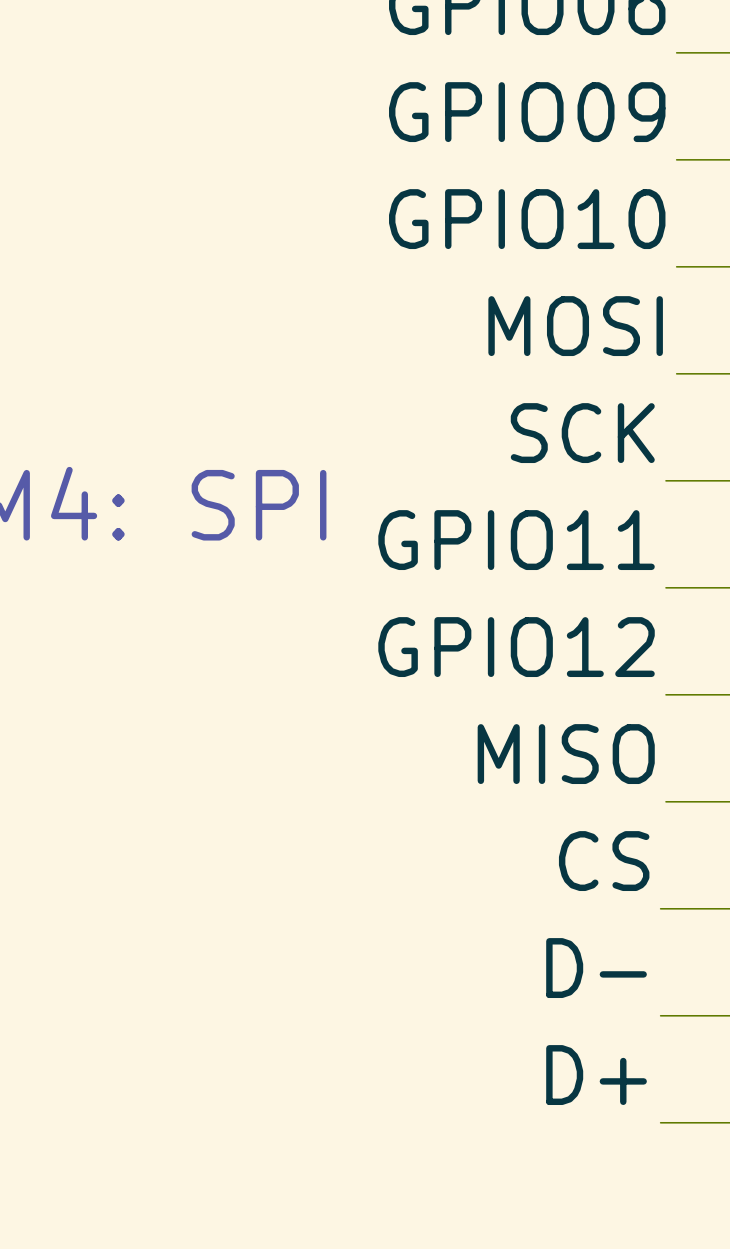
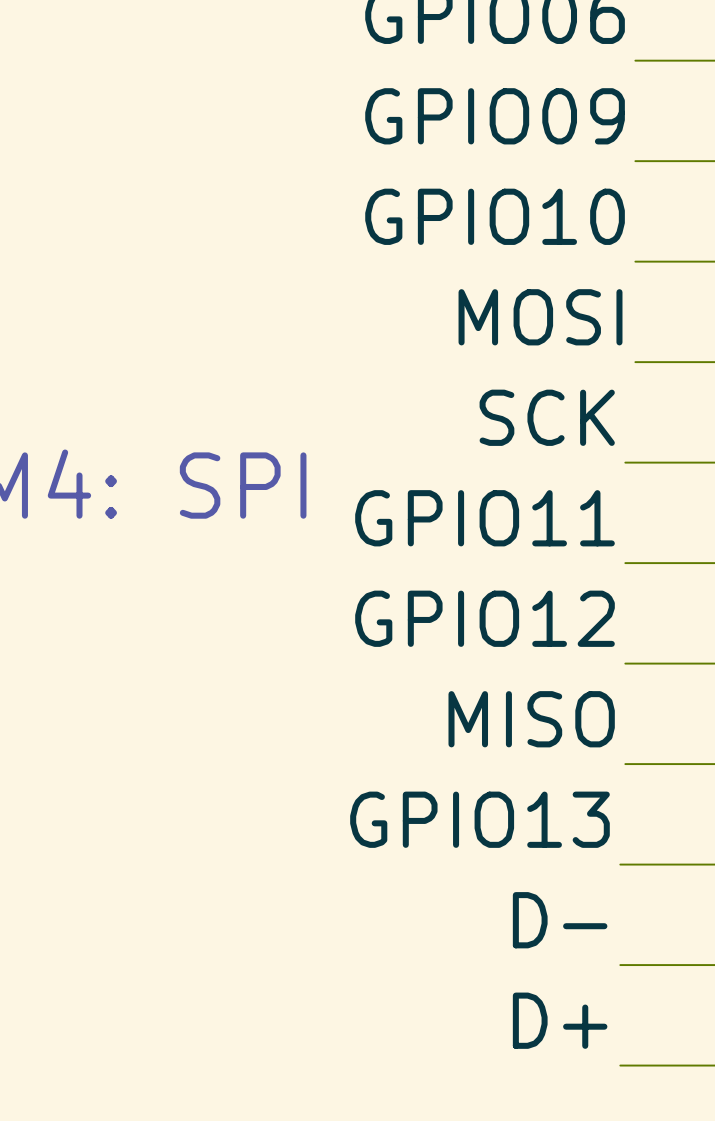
label: CS (604, 861) -> GPIO13 (479, 819)

